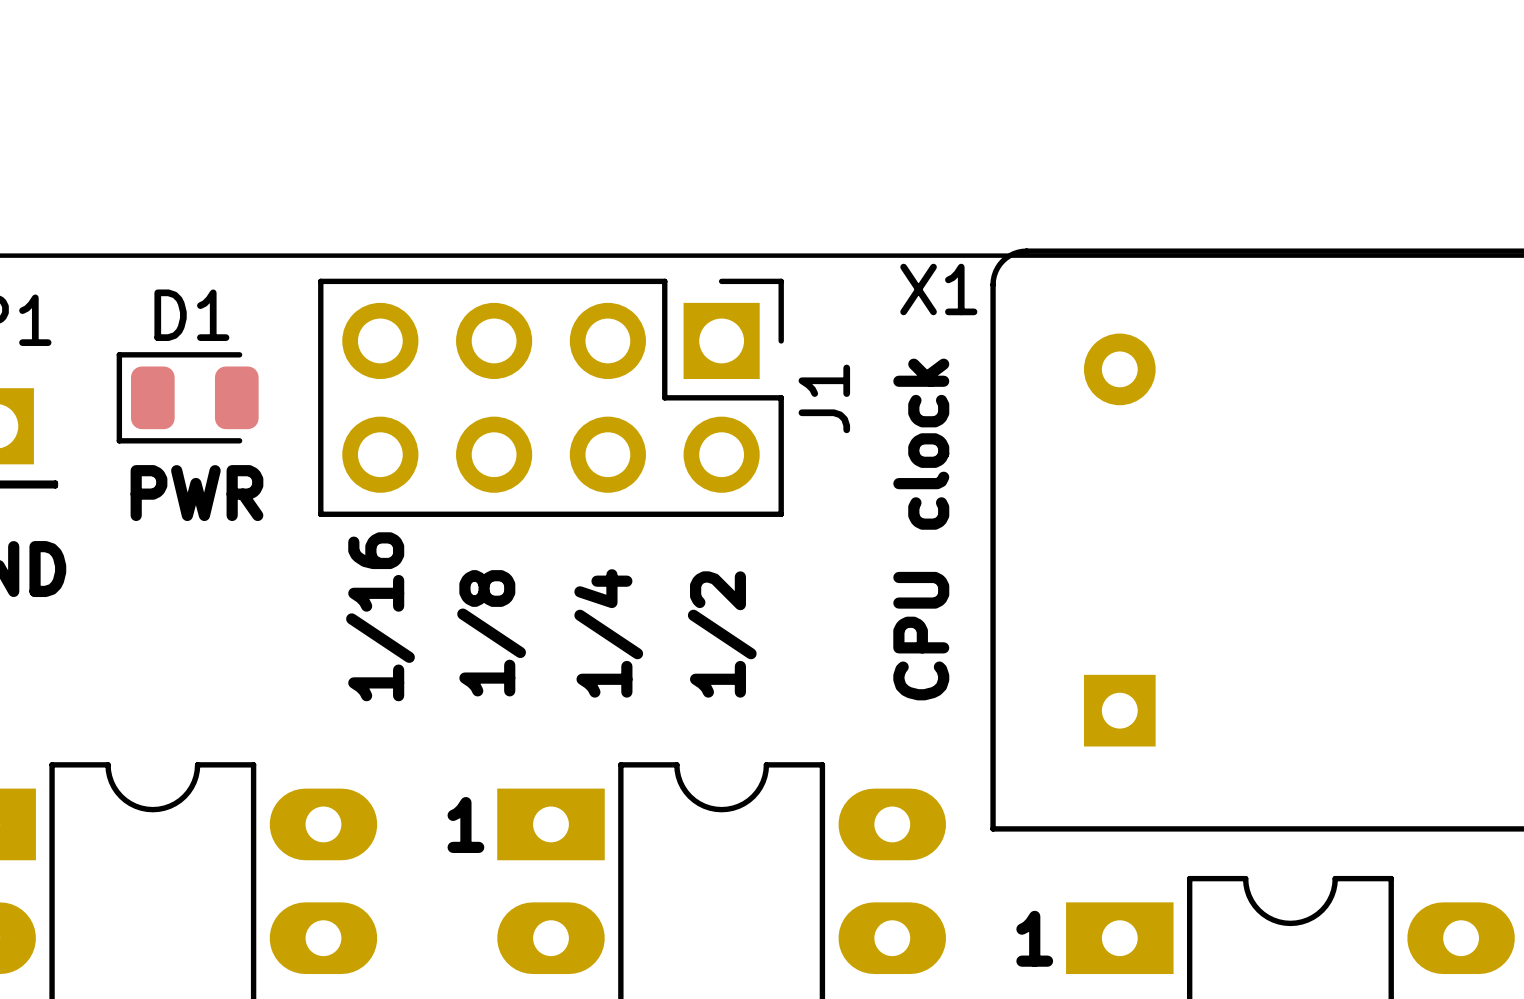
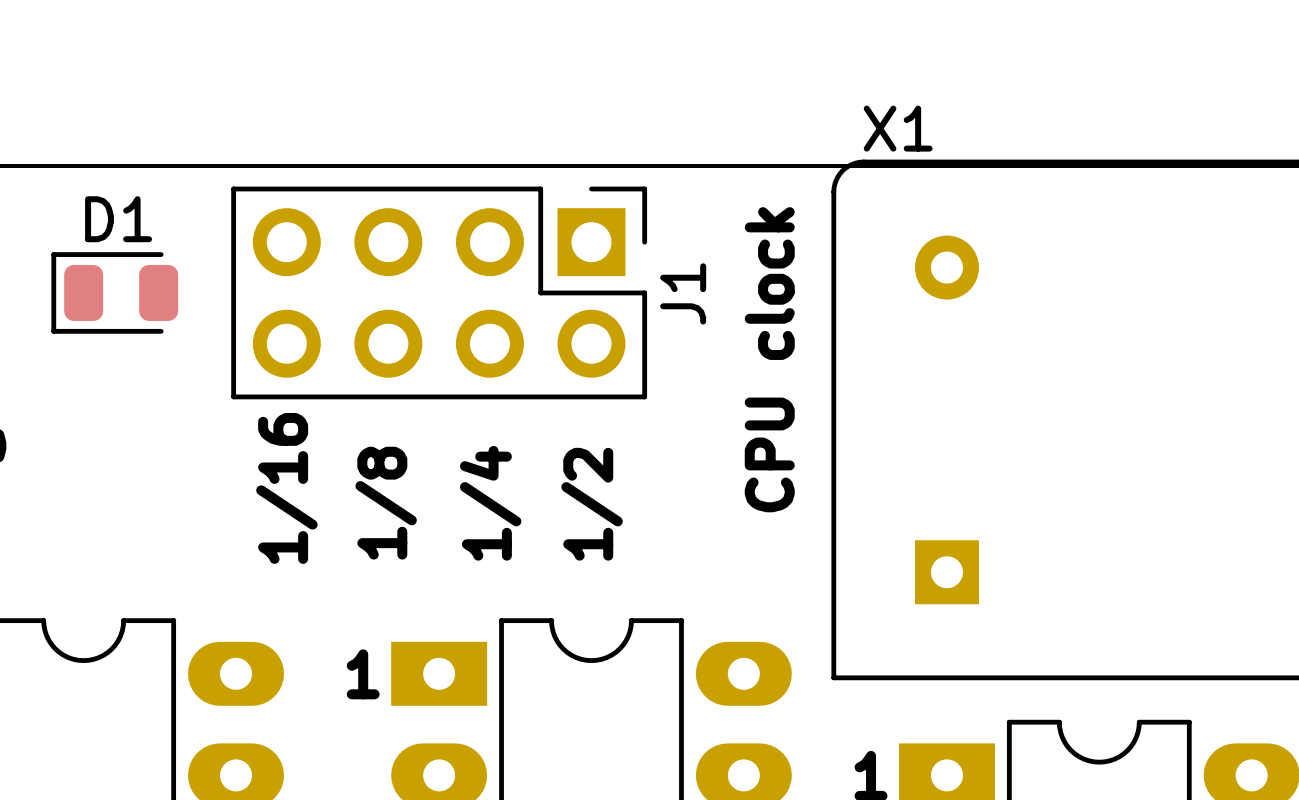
X1 name position: X1 (938, 289) -> X1 (898, 128)
text: PWR (196, 493) -> none
text position: CPU clock (921, 529) -> CPU clock (769, 359)

